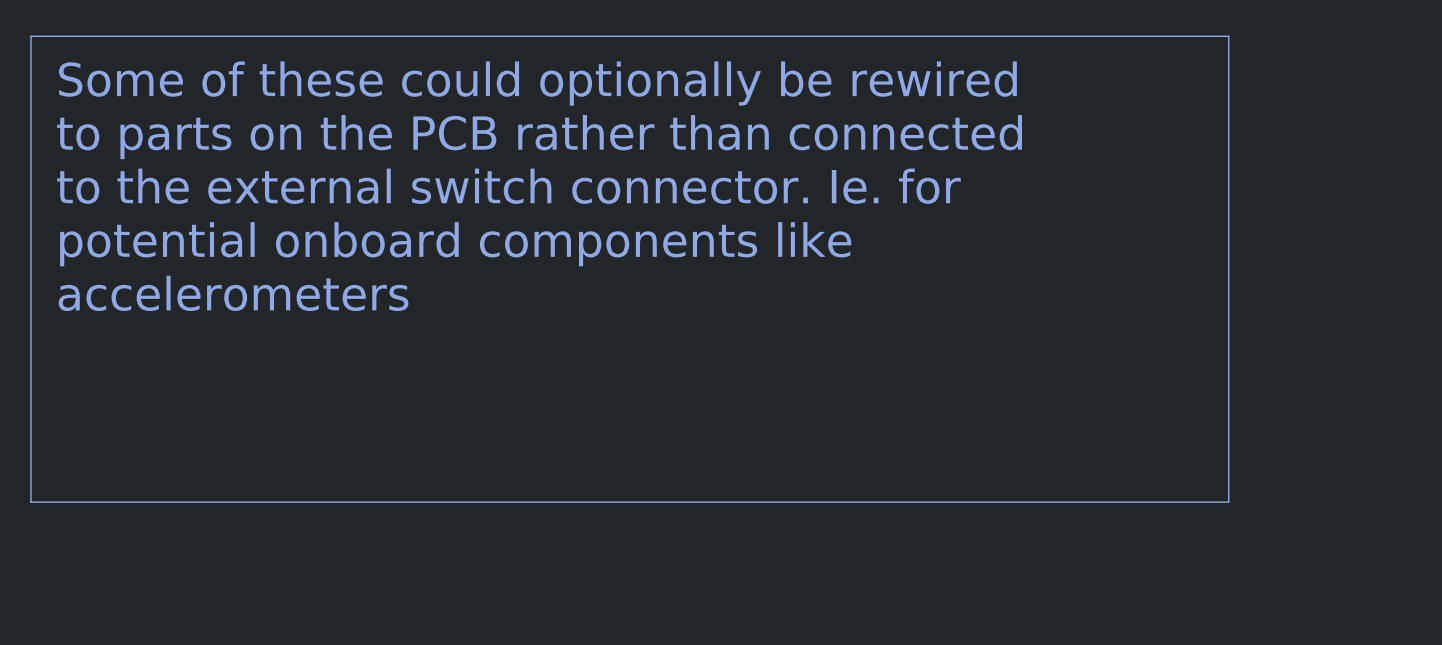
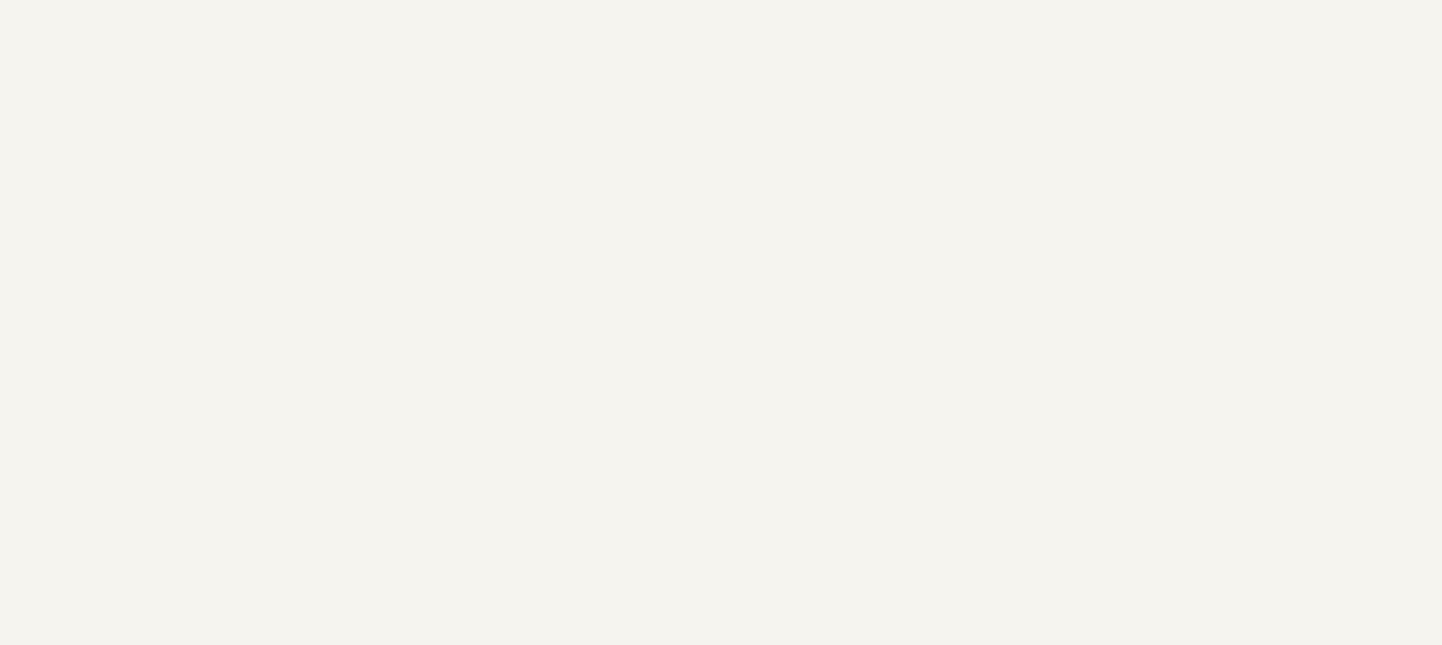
line: (31, 36) (1228, 36) (1228, 502) (31, 502) (31, 36) -> none
text: Some of these could optionally be rewired (537, 83) -> none
text: to parts on the PCB rather than connected (539, 137) -> none
text: to the external switch connector. Ie. for (508, 186) -> none
text: potential onboard components like (455, 244) -> none
text: accelerometers (233, 293) -> none

